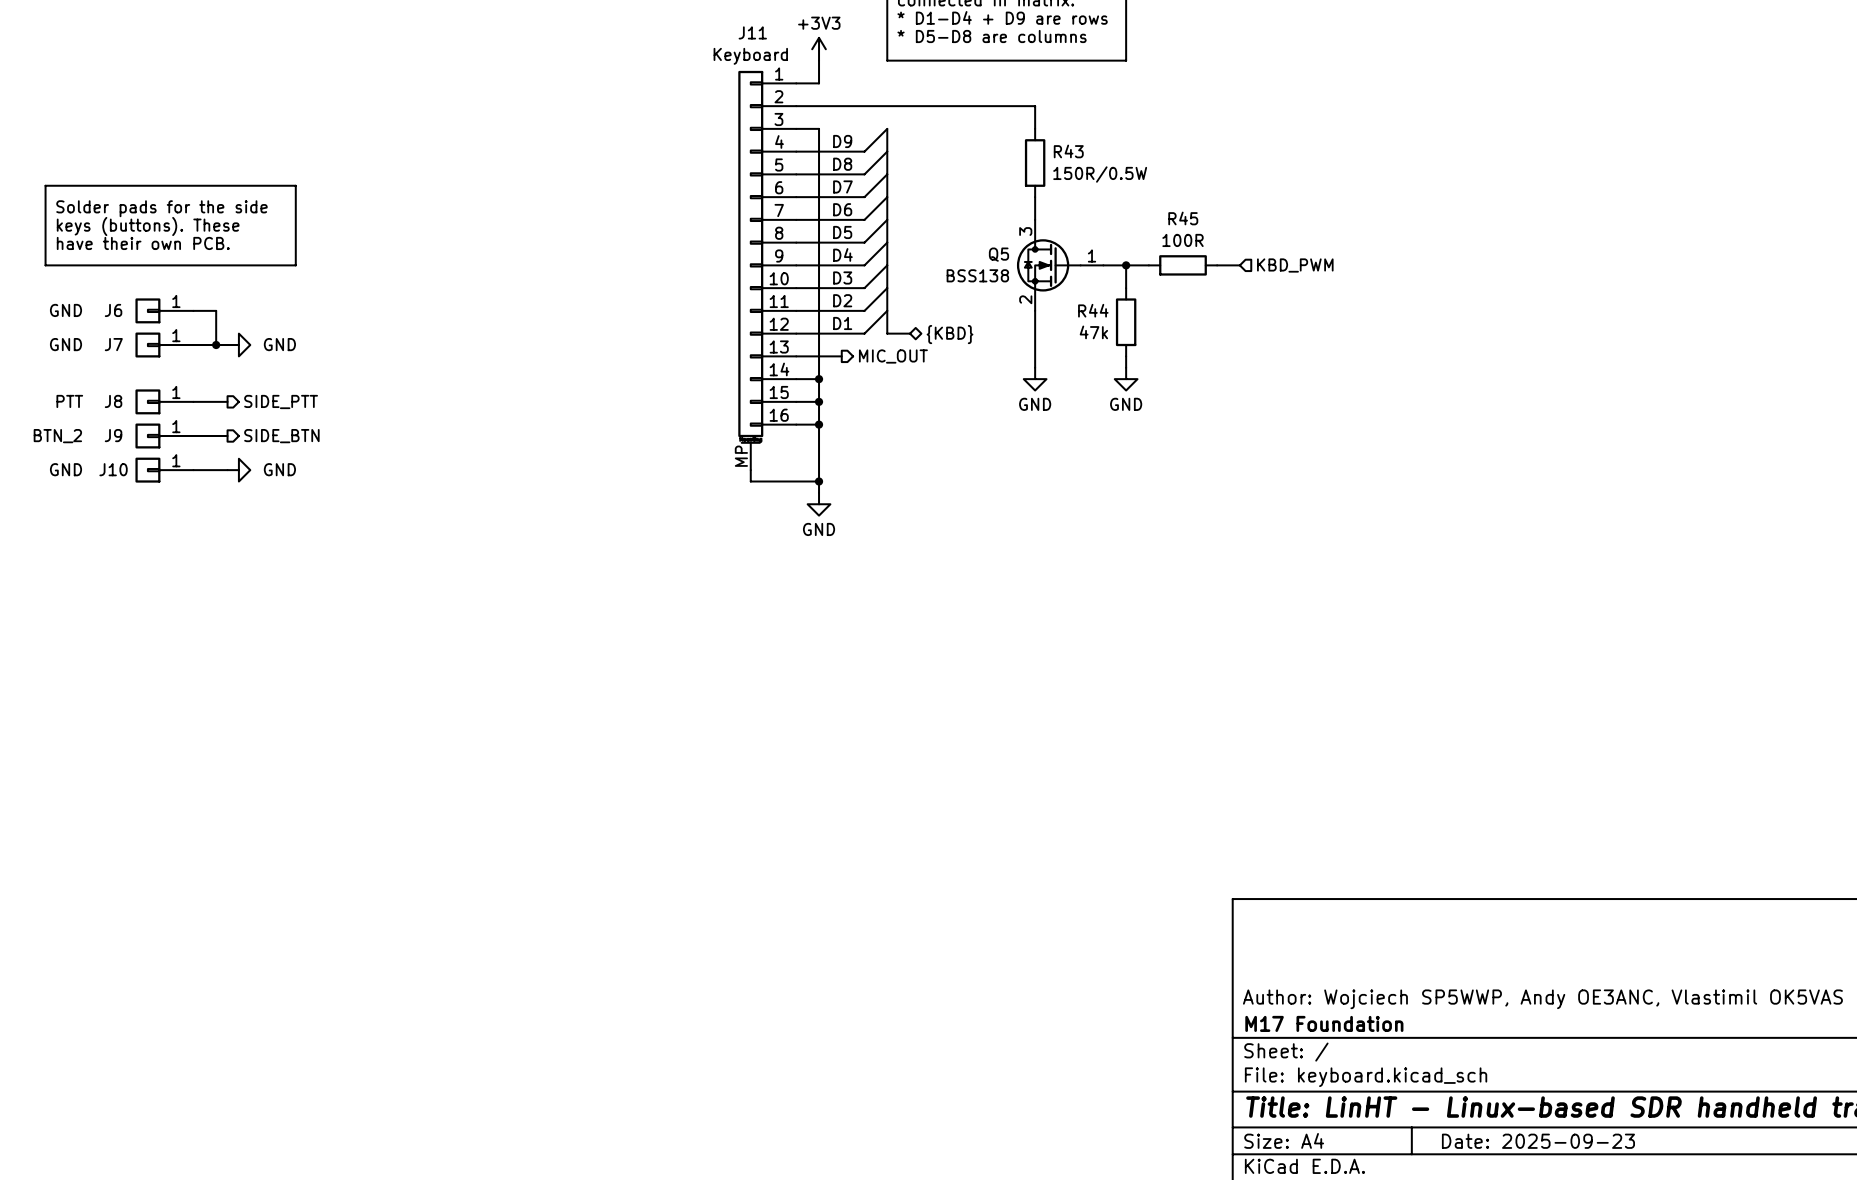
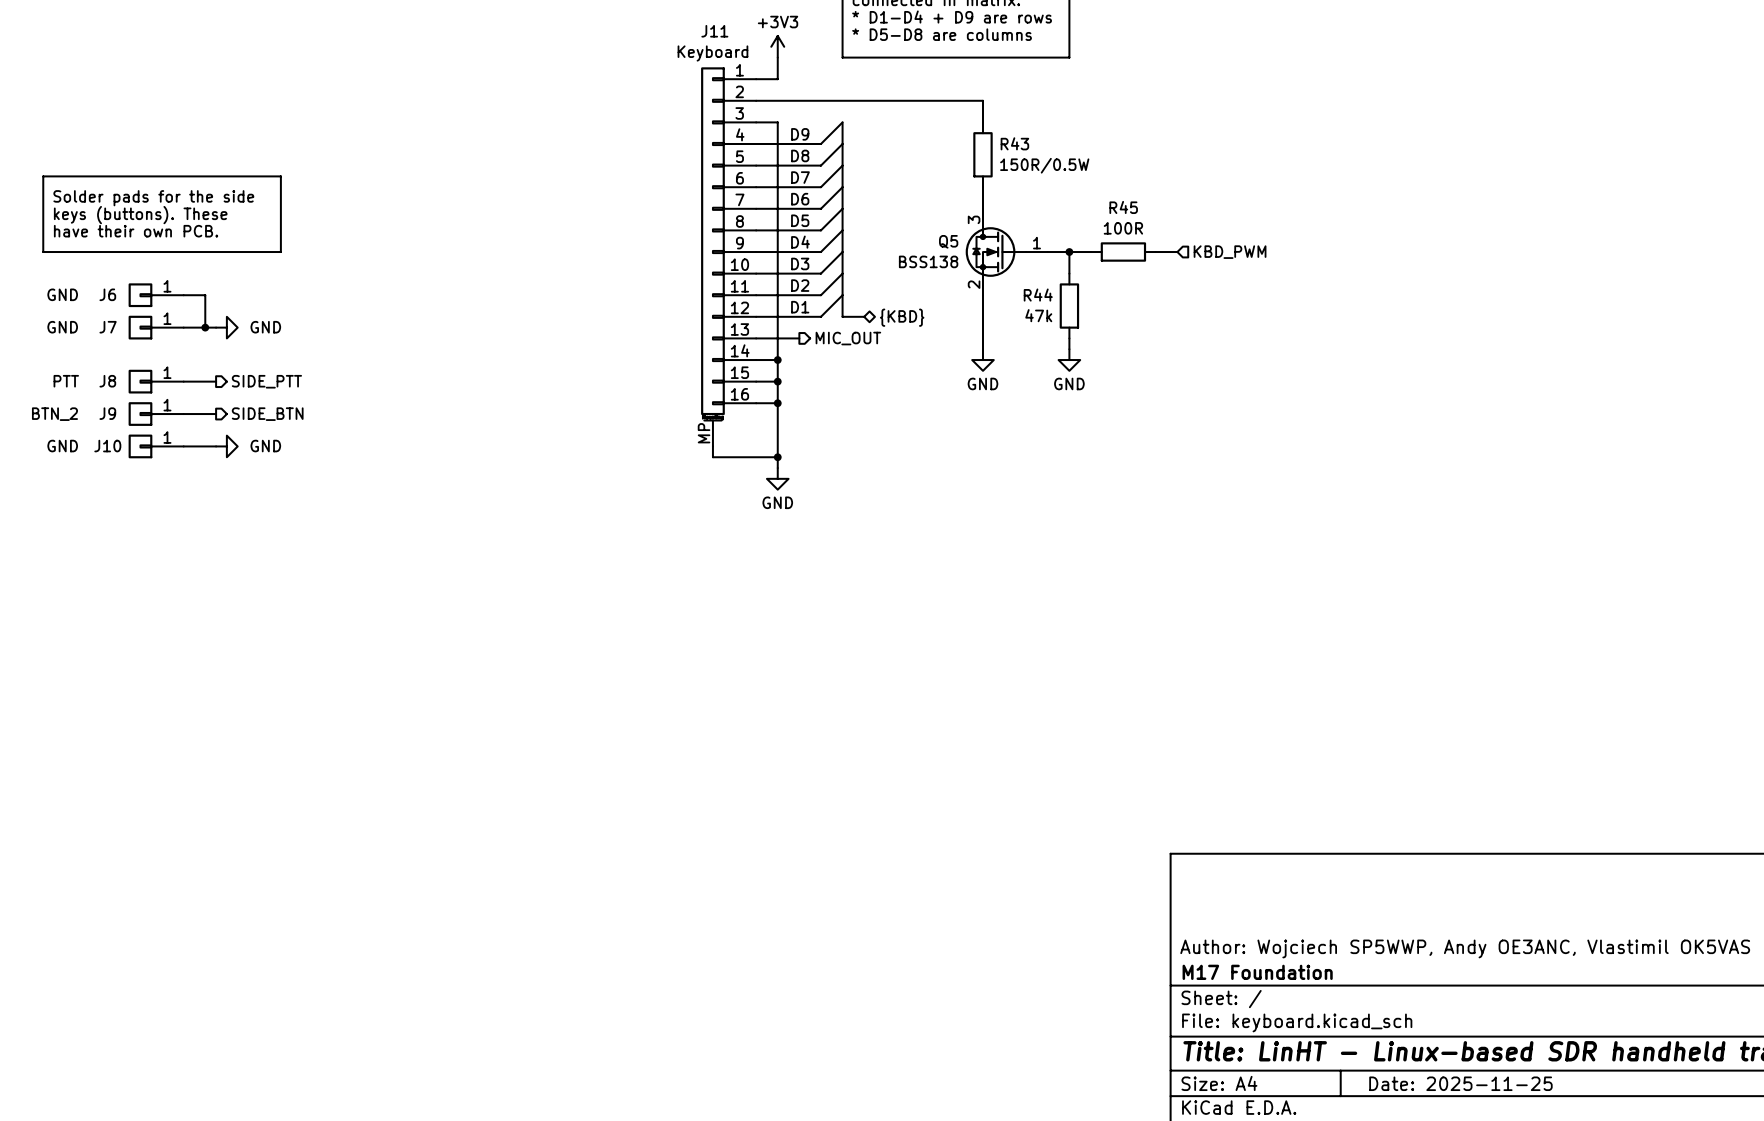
title block: Date: 2025-09-23 (1538, 1141) -> Date: 2025-11-25 (1460, 1083)

